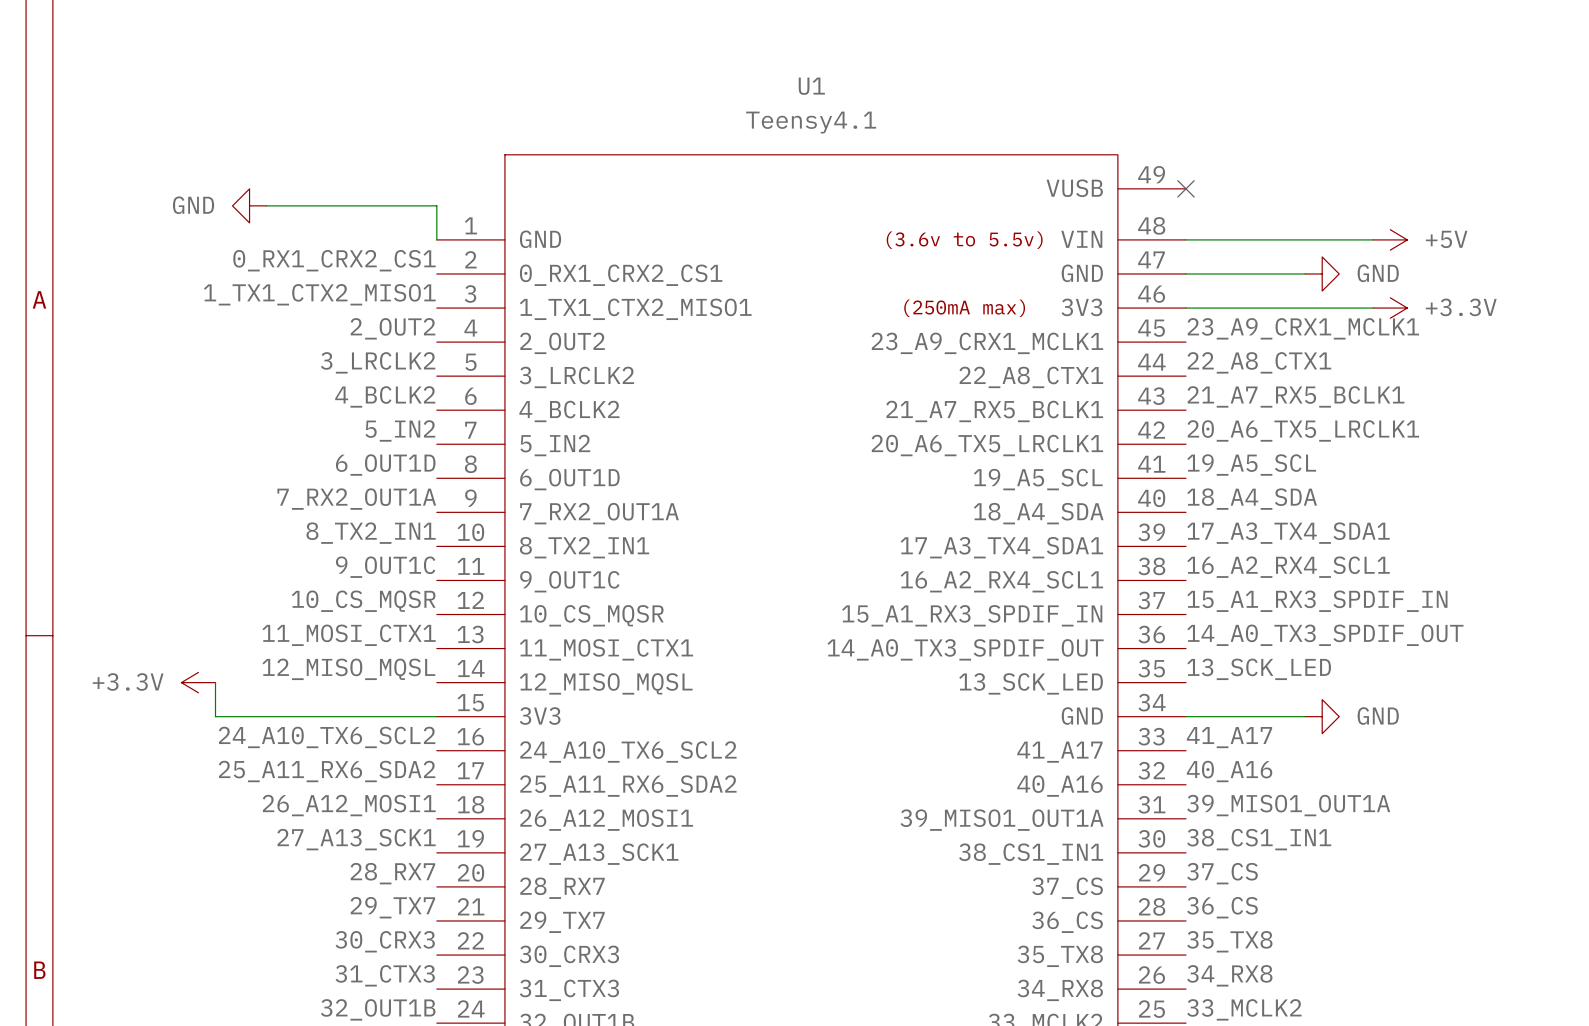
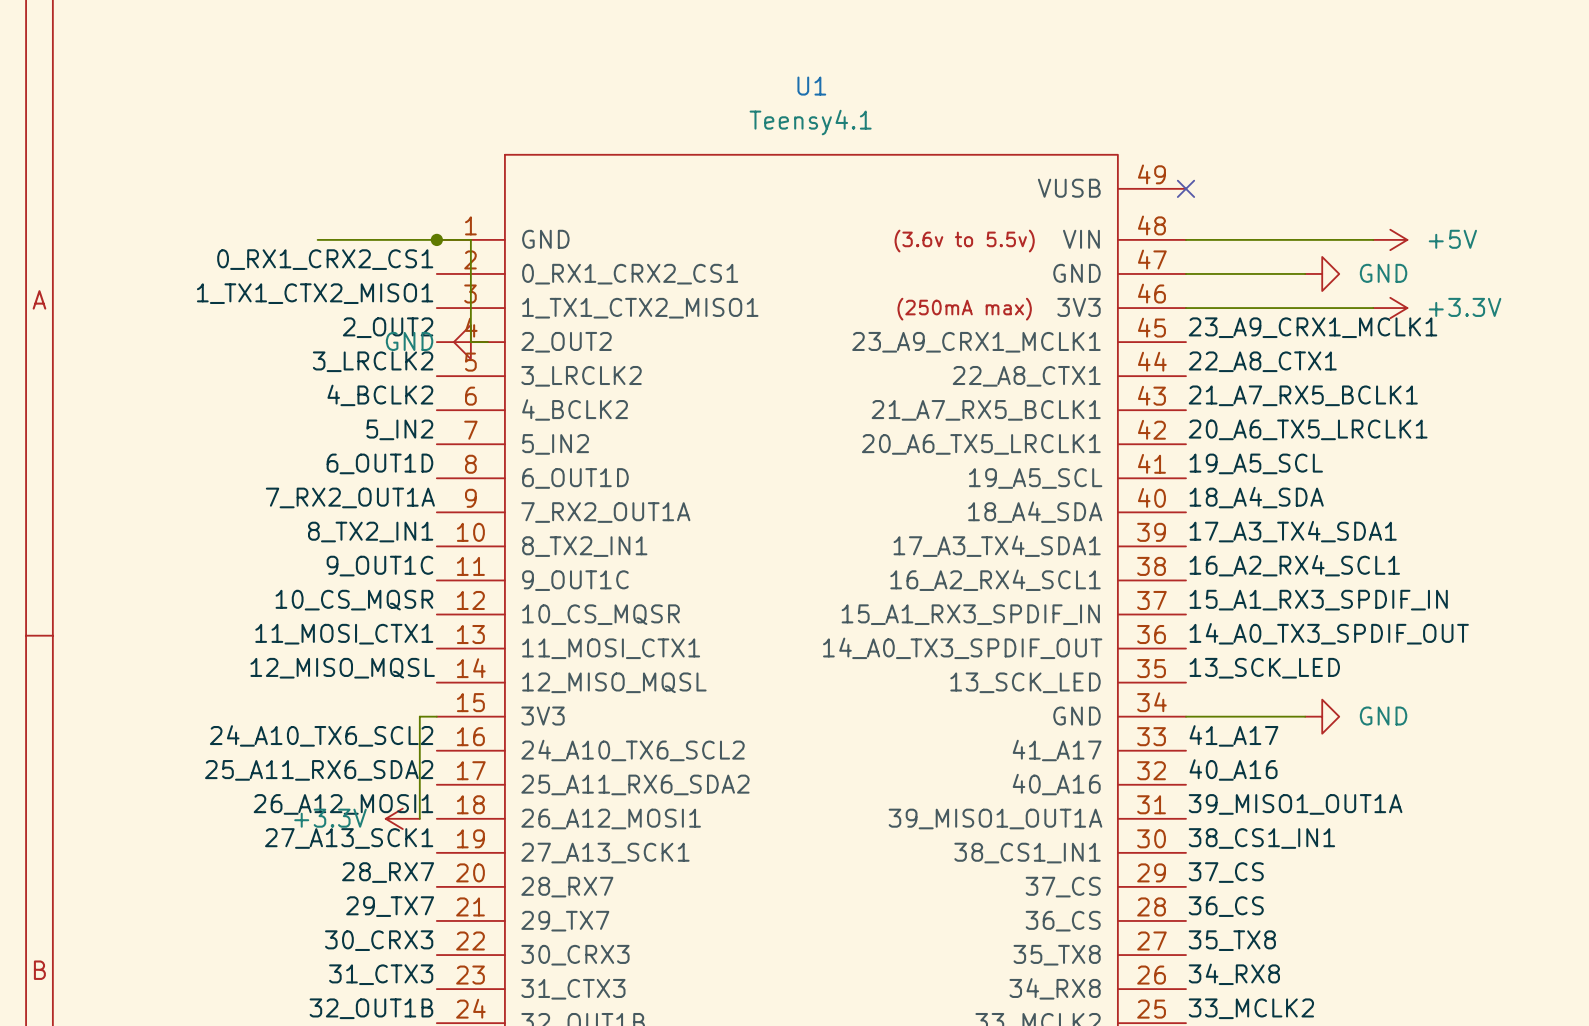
power symbol position: GND (249, 205) -> GND (470, 342)
wire: (266, 205) (436, 205) (436, 239) -> none
wire: none -> (317, 239) (470, 239) (470, 342) (487, 342)
junction: none -> (436, 239)
power symbol position: +3.3V (198, 682) -> +3.3V (402, 818)
wire: (215, 682) (215, 716) (419, 716) -> (419, 818) (419, 716)

